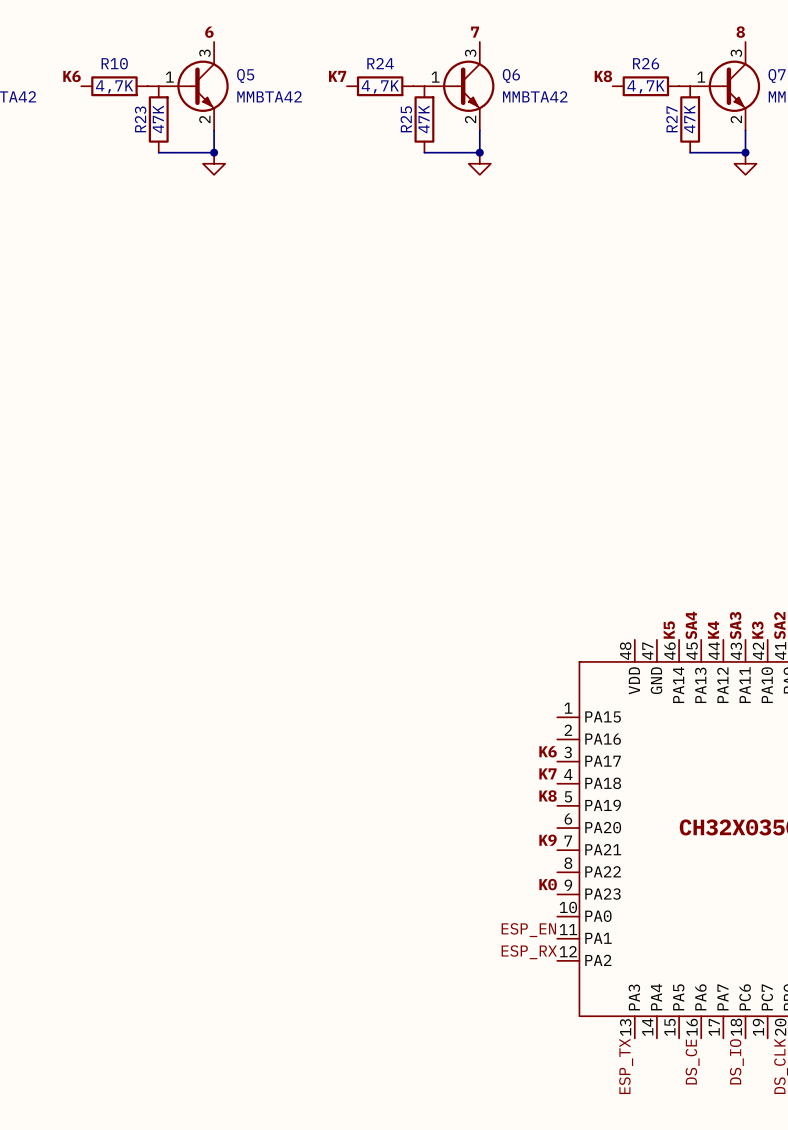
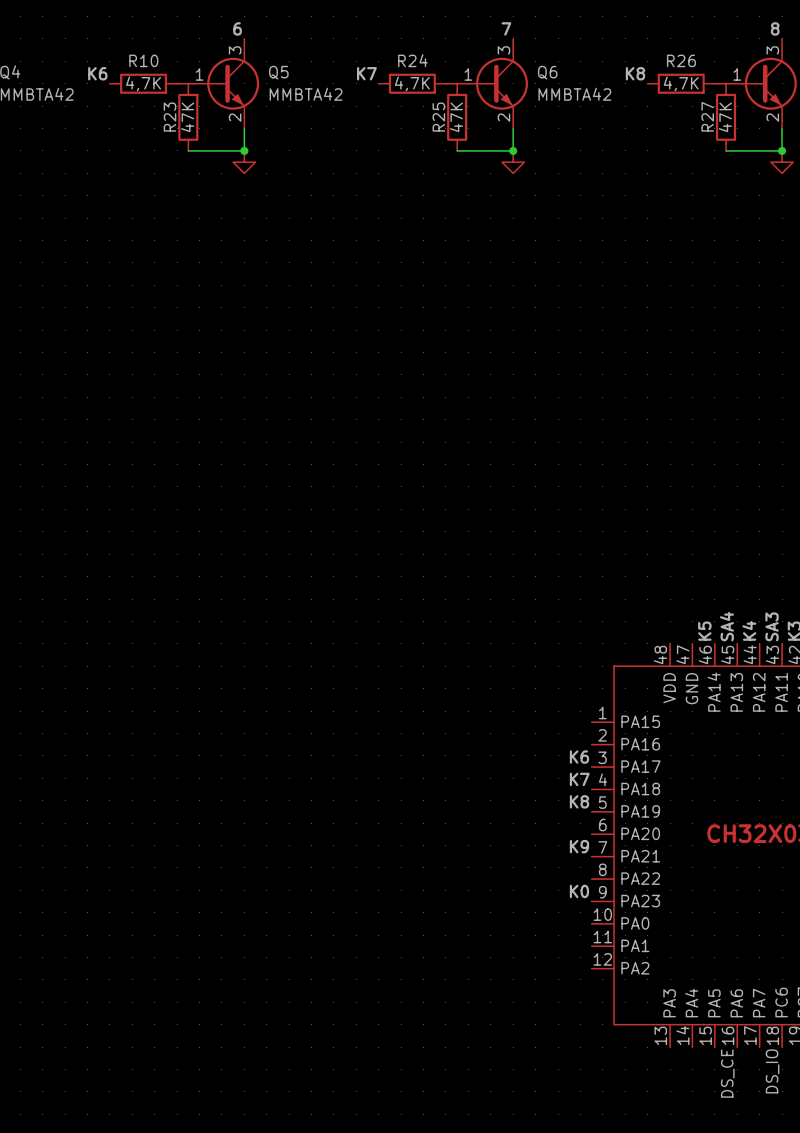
label: ESP_EN (528, 930) -> none
label: ESP_RX (529, 952) -> none
label: ESP_TX (626, 1066) -> none

